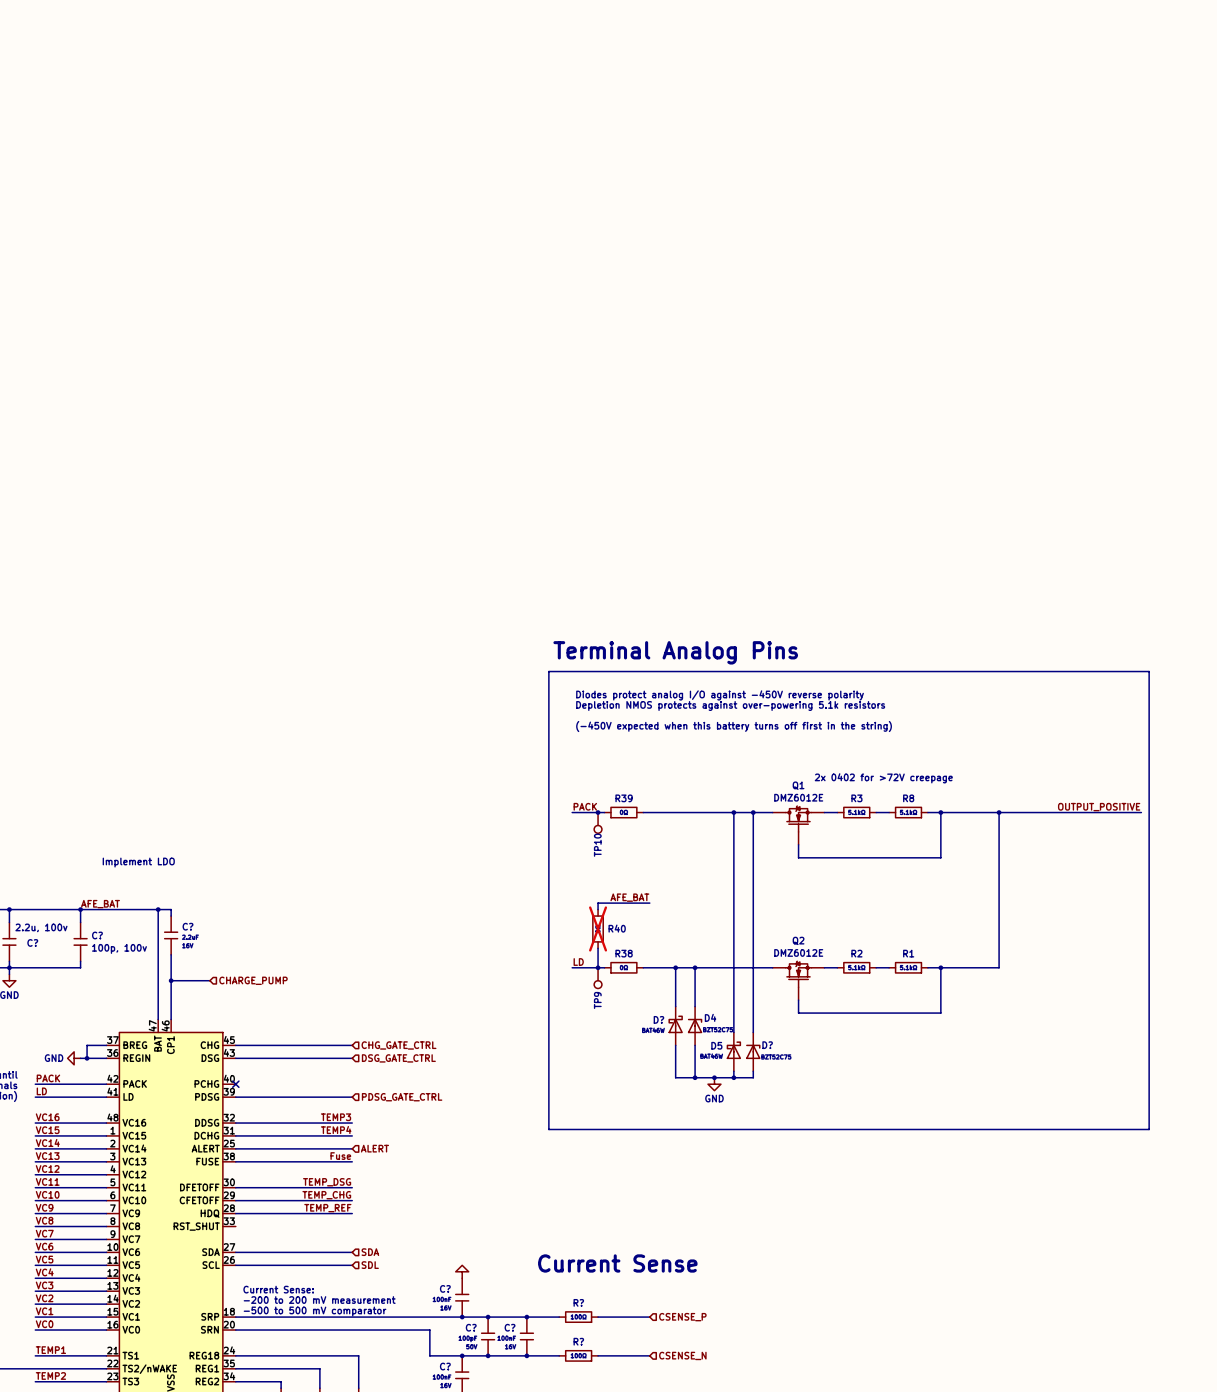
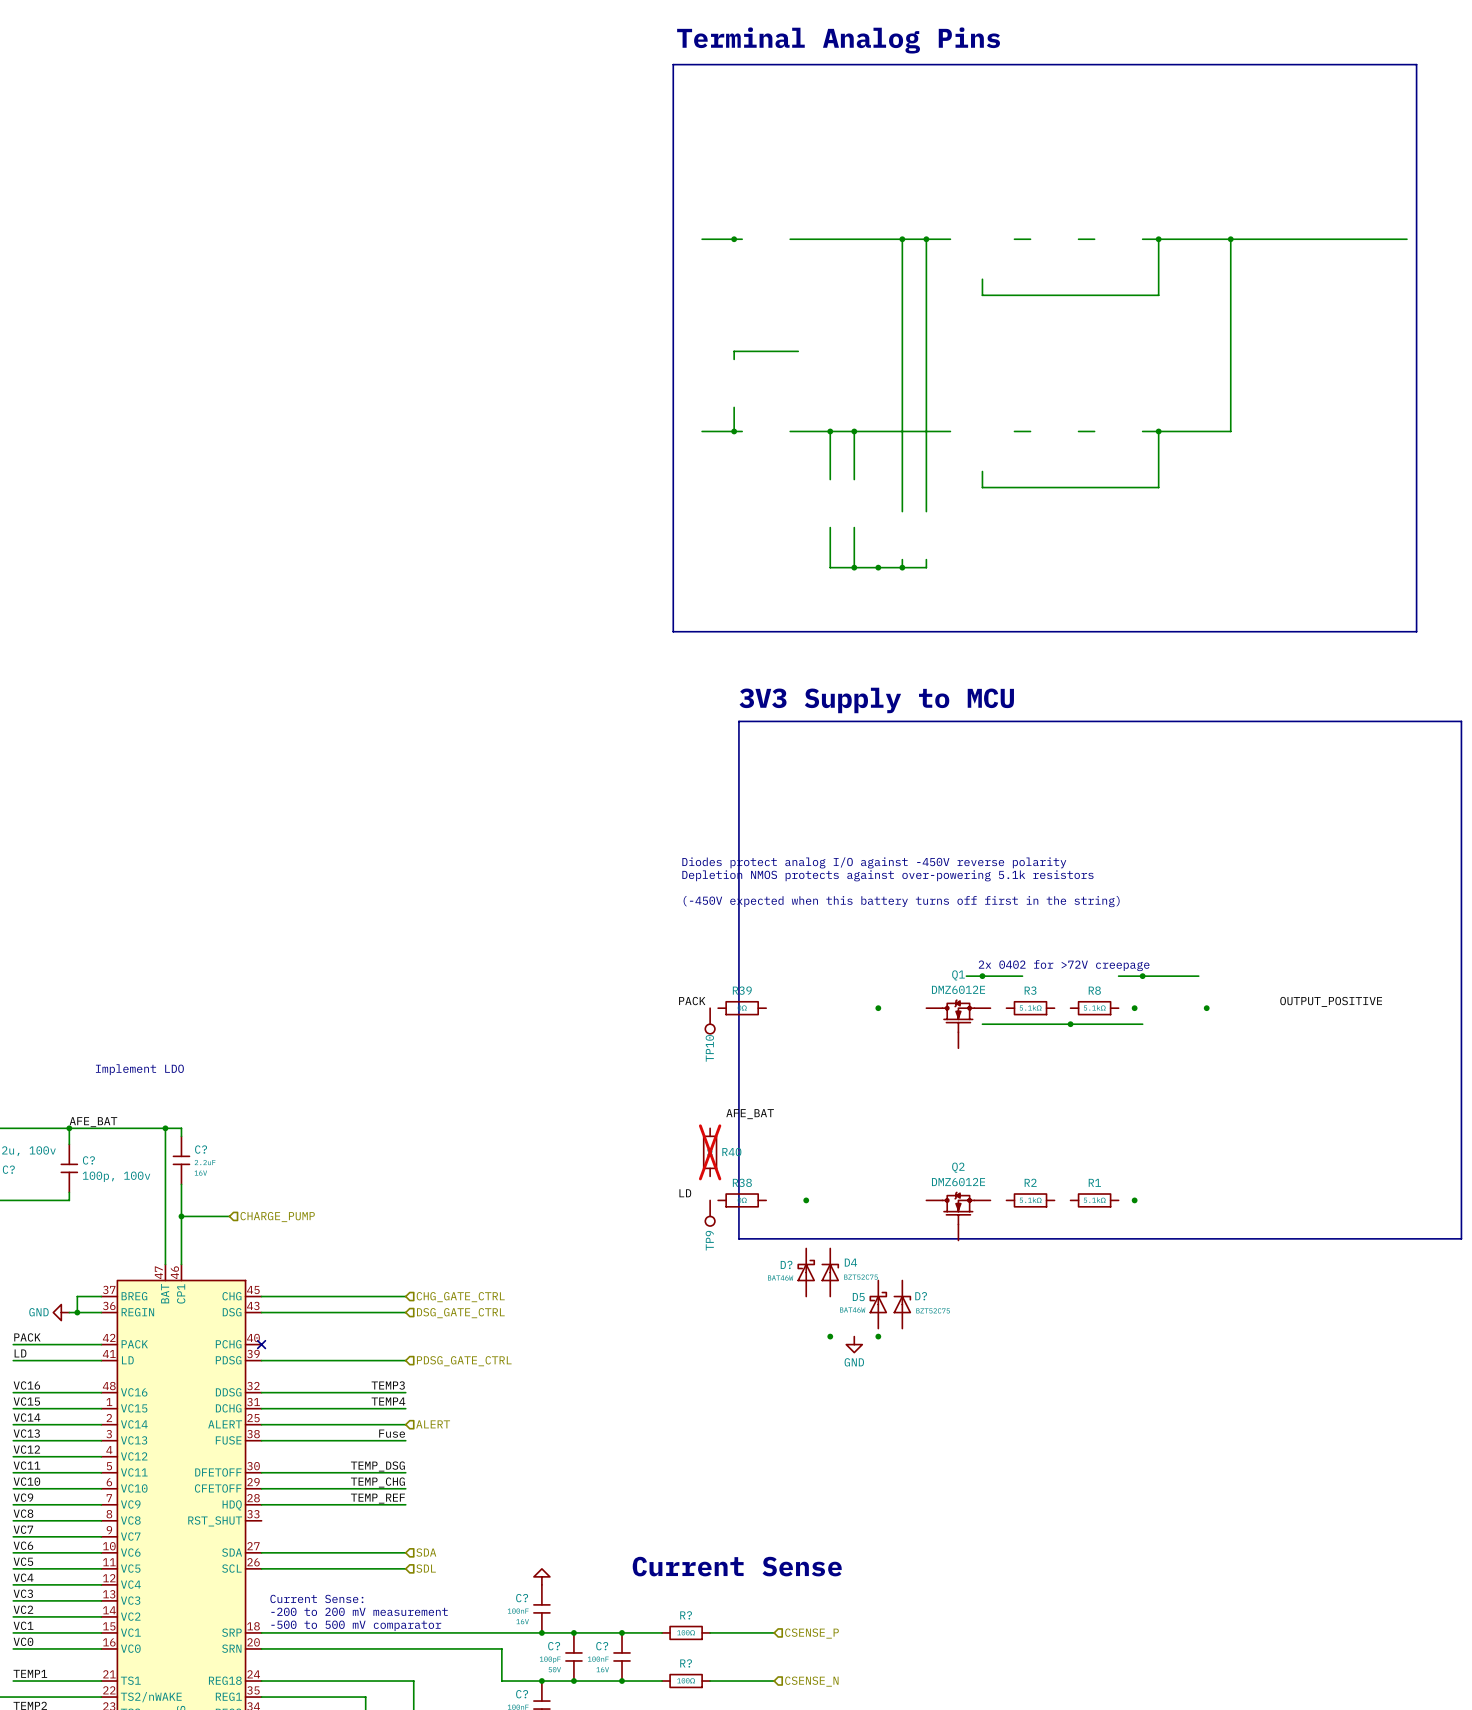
text: none -> Terminal Analog Pins (838, 40)
line: none -> (673, 64) (1416, 64) (1416, 631) (673, 631) (673, 64)
wire: none -> (702, 239) (742, 239)
junction: none -> (734, 239)
wire: none -> (790, 239) (950, 239)
wire: none -> (902, 239) (902, 511)
junction: none -> (902, 239)
wire: none -> (926, 239) (926, 511)
junction: none -> (926, 239)
wire: none -> (1014, 239) (1030, 239)
wire: none -> (1078, 239) (1094, 239)
wire: none -> (1142, 239) (1406, 239)
wire: none -> (1158, 239) (1158, 295) (982, 295) (982, 279)
junction: none -> (1158, 239)
wire: none -> (1230, 239) (1230, 431) (1142, 431)
junction: none -> (1230, 239)
wire: none -> (798, 351) (734, 351) (734, 359)
wire: none -> (734, 407) (734, 431)
wire: none -> (702, 431) (742, 431)
junction: none -> (734, 431)
wire: none -> (790, 431) (950, 431)
wire: none -> (830, 431) (830, 479)
junction: none -> (830, 431)
wire: none -> (854, 431) (854, 479)
junction: none -> (854, 431)
wire: none -> (1014, 431) (1030, 431)
wire: none -> (1078, 431) (1094, 431)
wire: none -> (1158, 431) (1158, 487) (982, 487) (982, 471)
junction: none -> (1158, 431)
wire: none -> (830, 527) (830, 567) (926, 567) (926, 559)
wire: none -> (854, 527) (854, 567)
wire: none -> (902, 559) (902, 567)
junction: none -> (854, 567)
junction: none -> (878, 567)
junction: none -> (902, 567)
text: none -> 3V3 Supply to MCU (876, 700)
line: none -> (738, 721) (1461, 721) (1461, 1238) (738, 1238) (738, 721)
text: Terminal Analog Pins (675, 652) -> none
line: (548, 671) (1149, 671) (1149, 1129) (548, 1129) (548, 671) -> none
wire: none -> (966, 976) (1022, 976)
junction: none -> (982, 976)
wire: none -> (1118, 976) (1198, 976)
junction: none -> (1142, 976)
wire: (572, 812) (604, 812) -> none
junction: (598, 812) -> none
wire: (643, 812) (772, 812) -> none
wire: (733, 812) (733, 1032) -> none
wire: (753, 812) (753, 1032) -> none
junction: (753, 812) -> none
wire: (824, 812) (837, 812) -> none
wire: (876, 812) (889, 812) -> none
wire: (927, 812) (1141, 812) -> none
wire: (940, 812) (940, 857) (798, 857) (798, 844) -> none
wire: (999, 812) (999, 967) (927, 967) -> none
wire: none -> (982, 1024) (1142, 1024)
junction: none -> (1070, 1024)
wire: (649, 903) (598, 903) (598, 909) -> none
wire: (598, 948) (598, 967) -> none
wire: (572, 967) (604, 967) -> none
junction: (598, 967) -> none
wire: (643, 967) (772, 967) -> none
wire: (675, 967) (675, 1006) -> none
wire: (695, 967) (695, 1006) -> none
junction: (695, 967) -> none
wire: (824, 967) (837, 967) -> none
wire: (876, 967) (889, 967) -> none
wire: (940, 967) (940, 1013) (798, 1013) (798, 1000) -> none
wire: (675, 1045) (675, 1077) (753, 1077) (753, 1071) -> none
wire: (695, 1045) (695, 1077) -> none
wire: (733, 1071) (733, 1077) -> none
junction: (714, 1077) -> none

